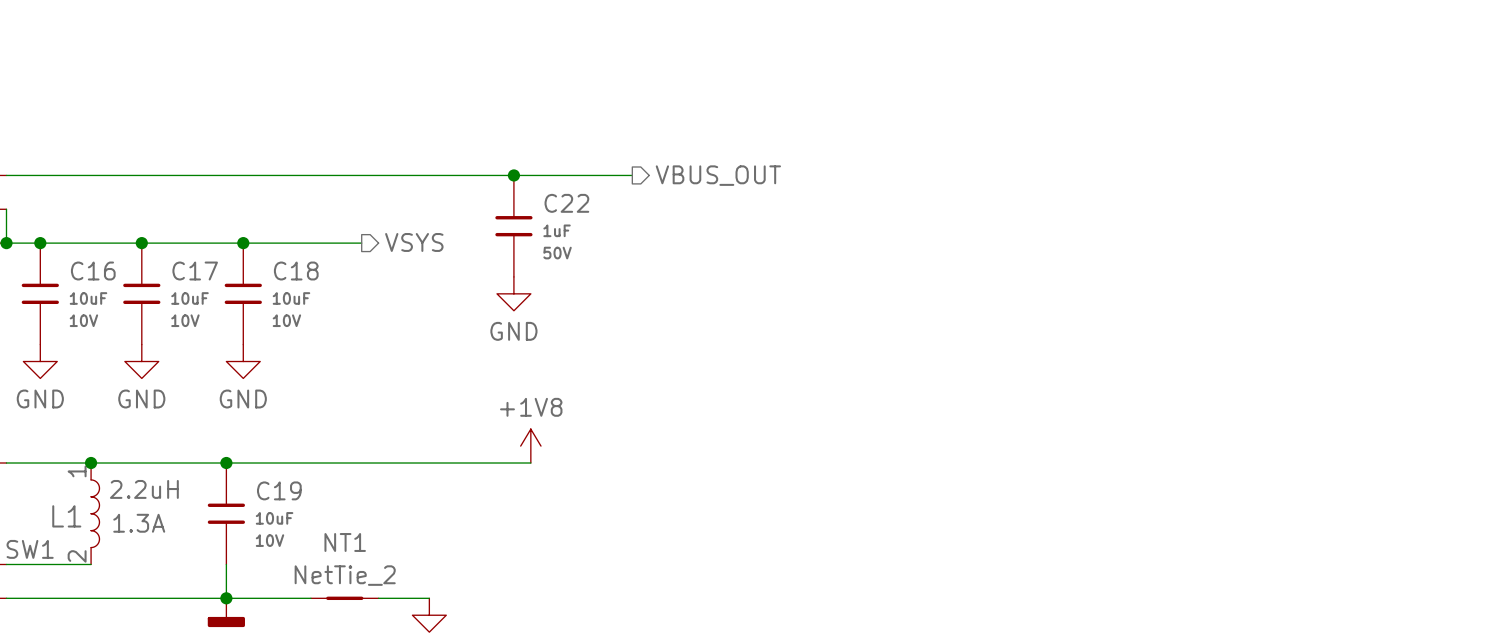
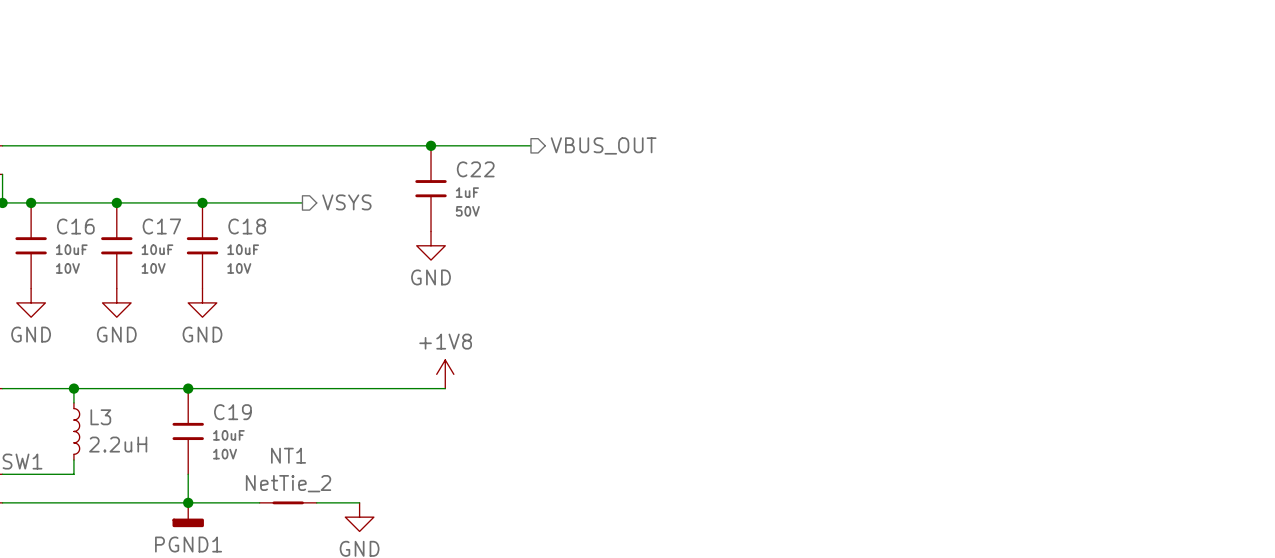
L3: none -> 2.2uH (76, 431)
L1: (95, 513) -> none

